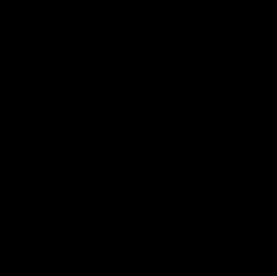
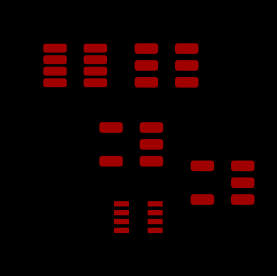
part: none -> (75, 65)
part: none -> (166, 65)
part: none -> (131, 144)
part: none -> (222, 182)
part: none -> (138, 217)

